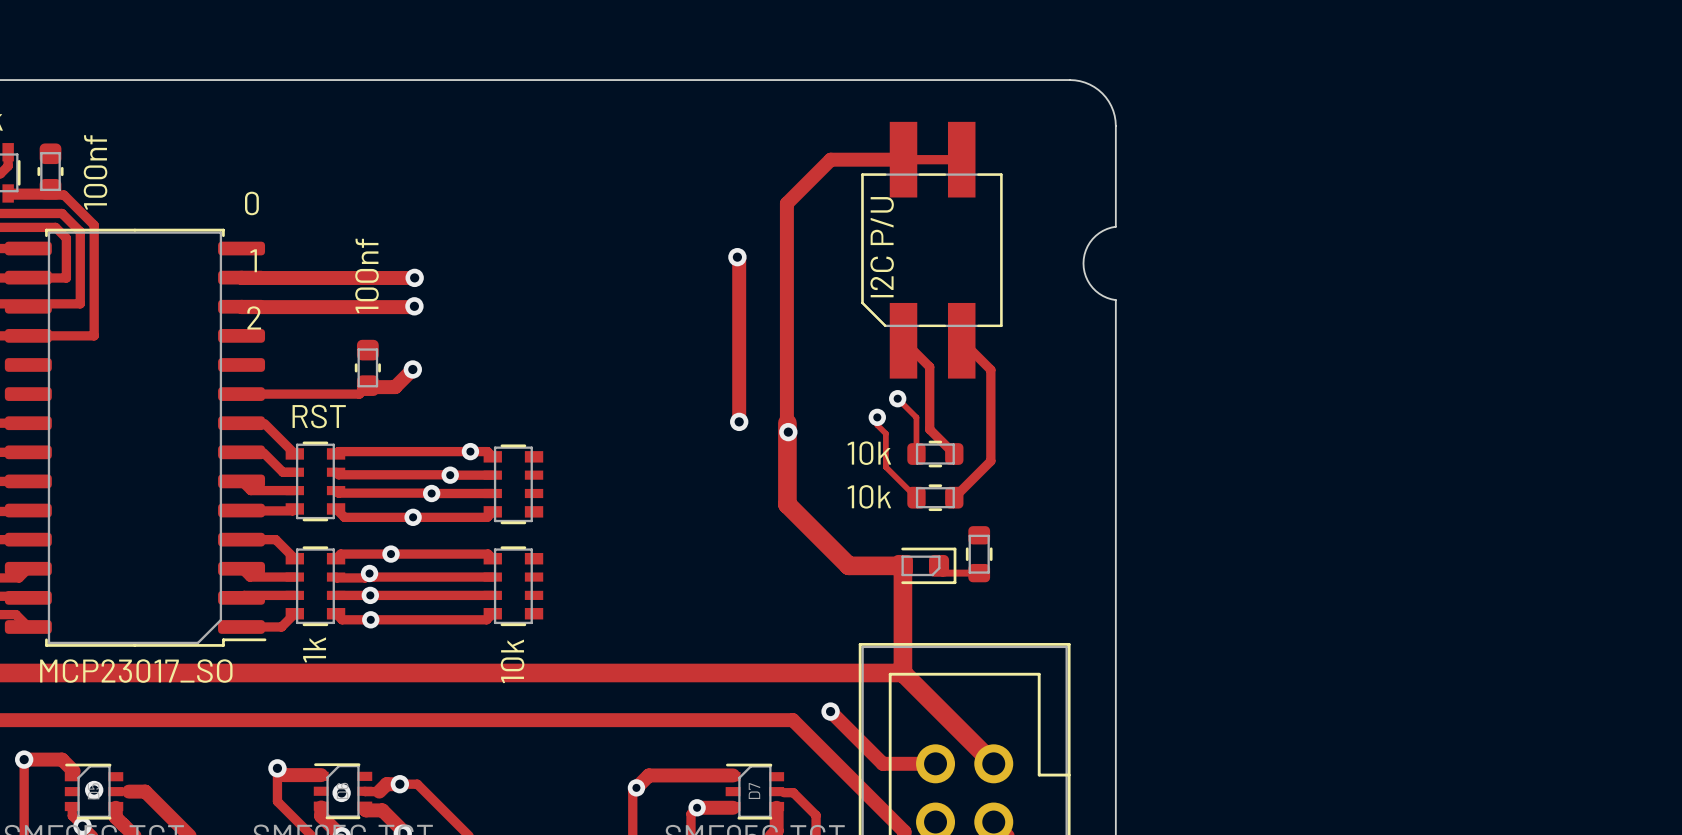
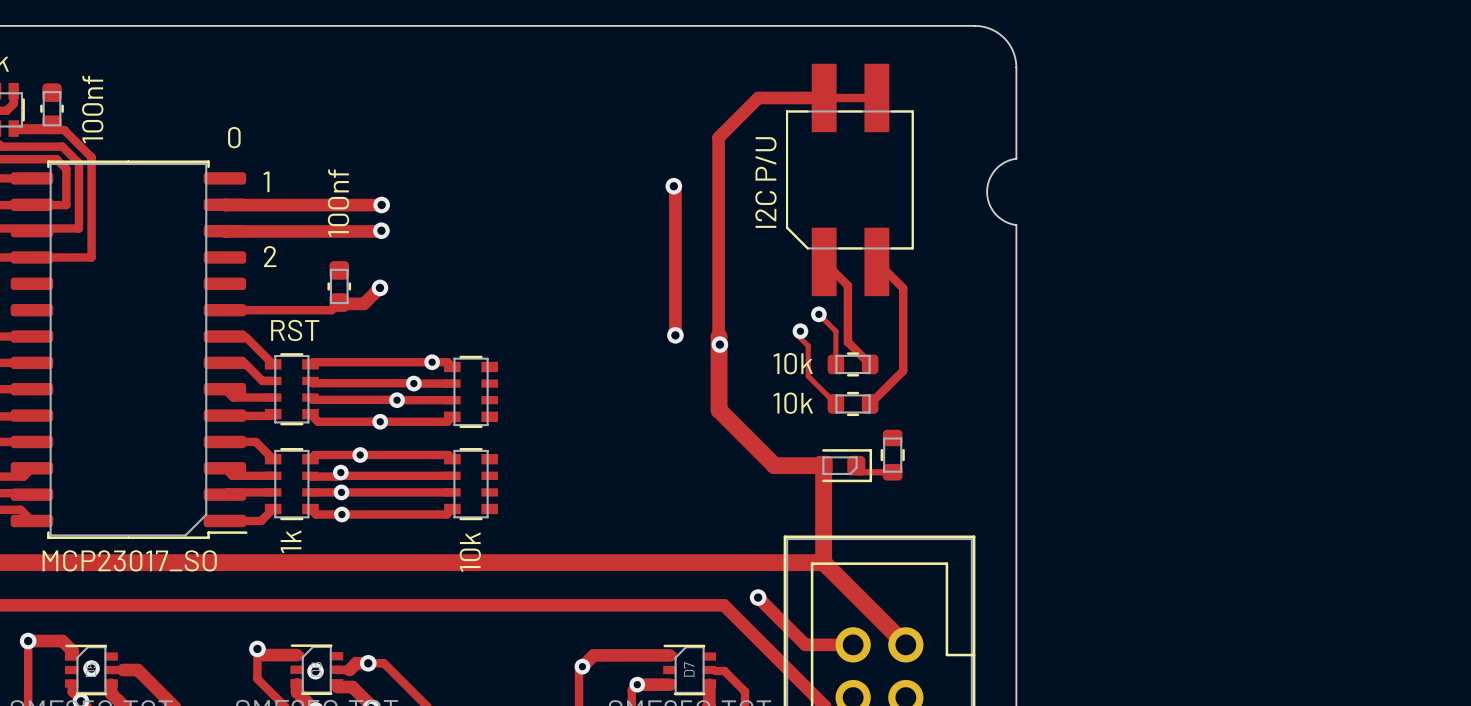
text position: I2C P/U (882, 247) -> I2C P/U (765, 182)
text position: 1 (253, 260) -> 1 (266, 181)
text position: 2 (254, 317) -> 2 (270, 256)

